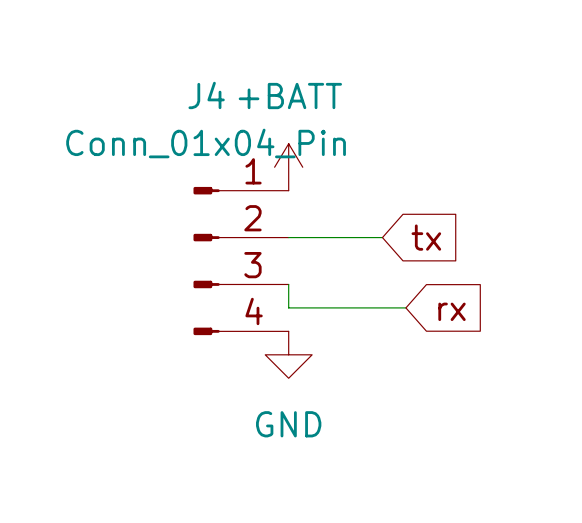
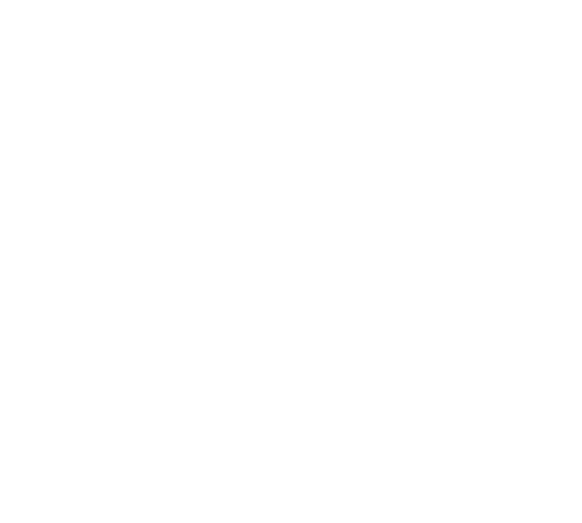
power symbol: +BATT (288, 167) -> none
wire: (288, 237) (382, 237) -> none
global label: tx (426, 237) -> none
J4: Conn_01x04_Pin (241, 261) -> none
wire: (288, 284) (288, 307) (405, 307) -> none
global label: rx (452, 311) -> none
power symbol: GND (288, 354) -> none

